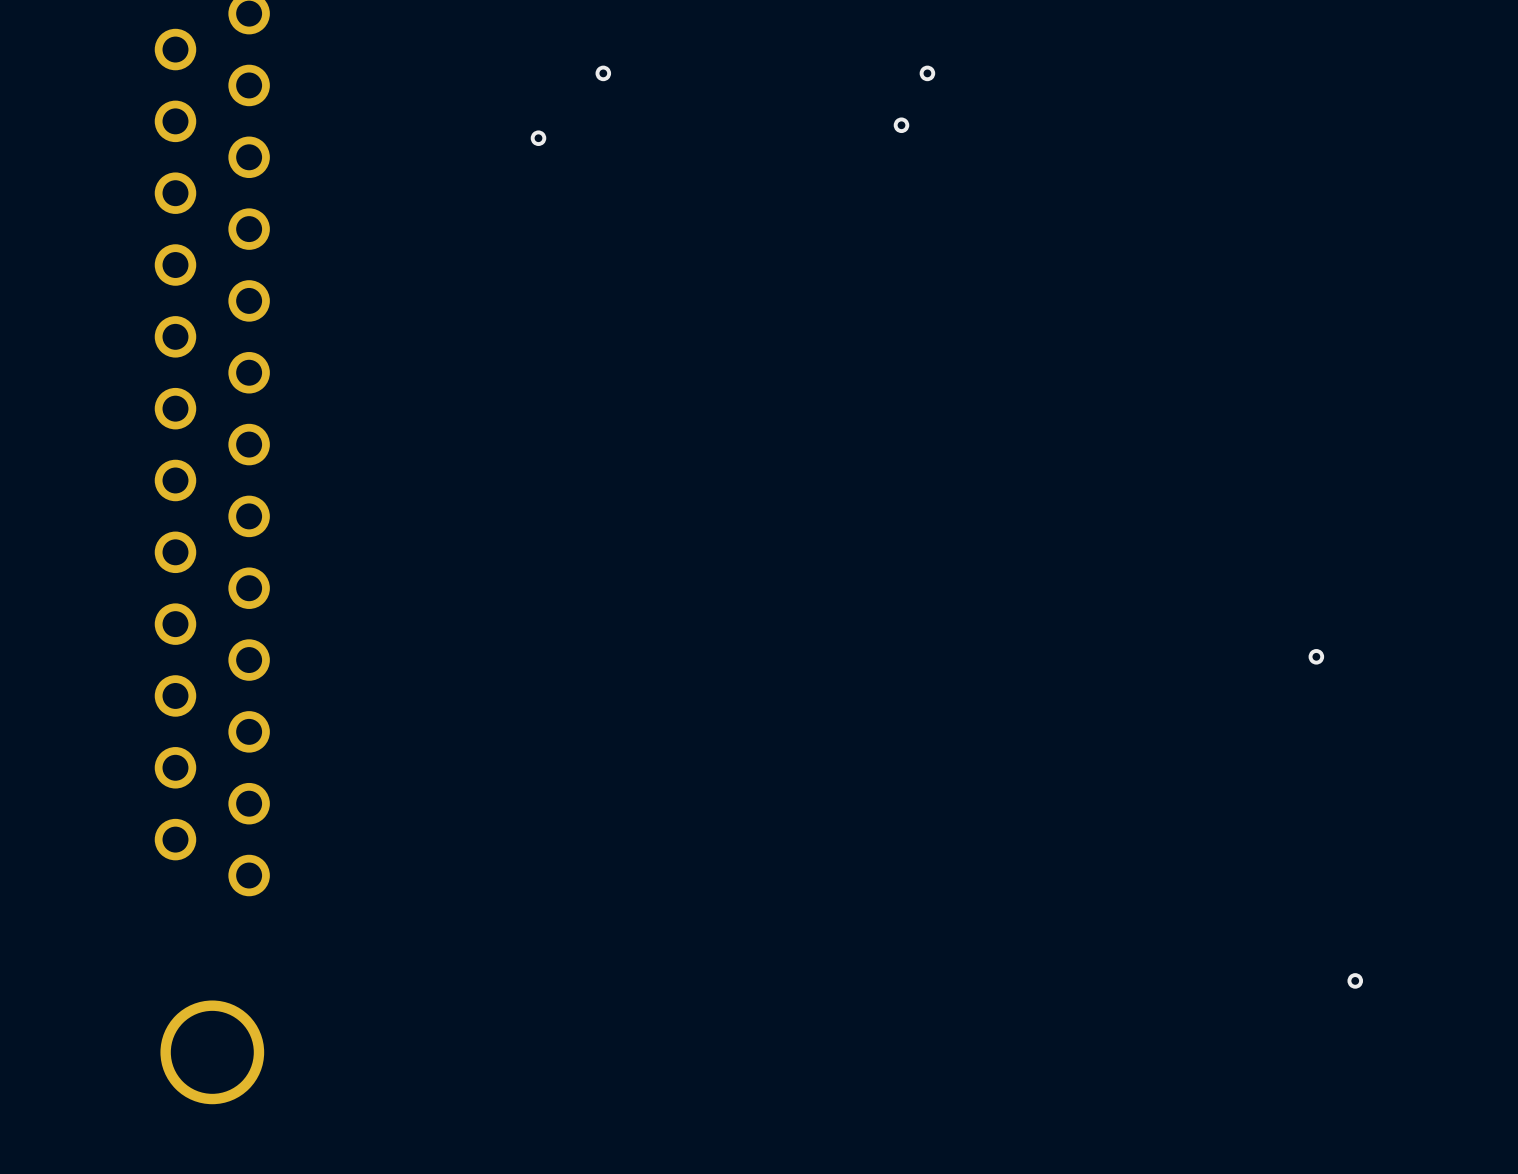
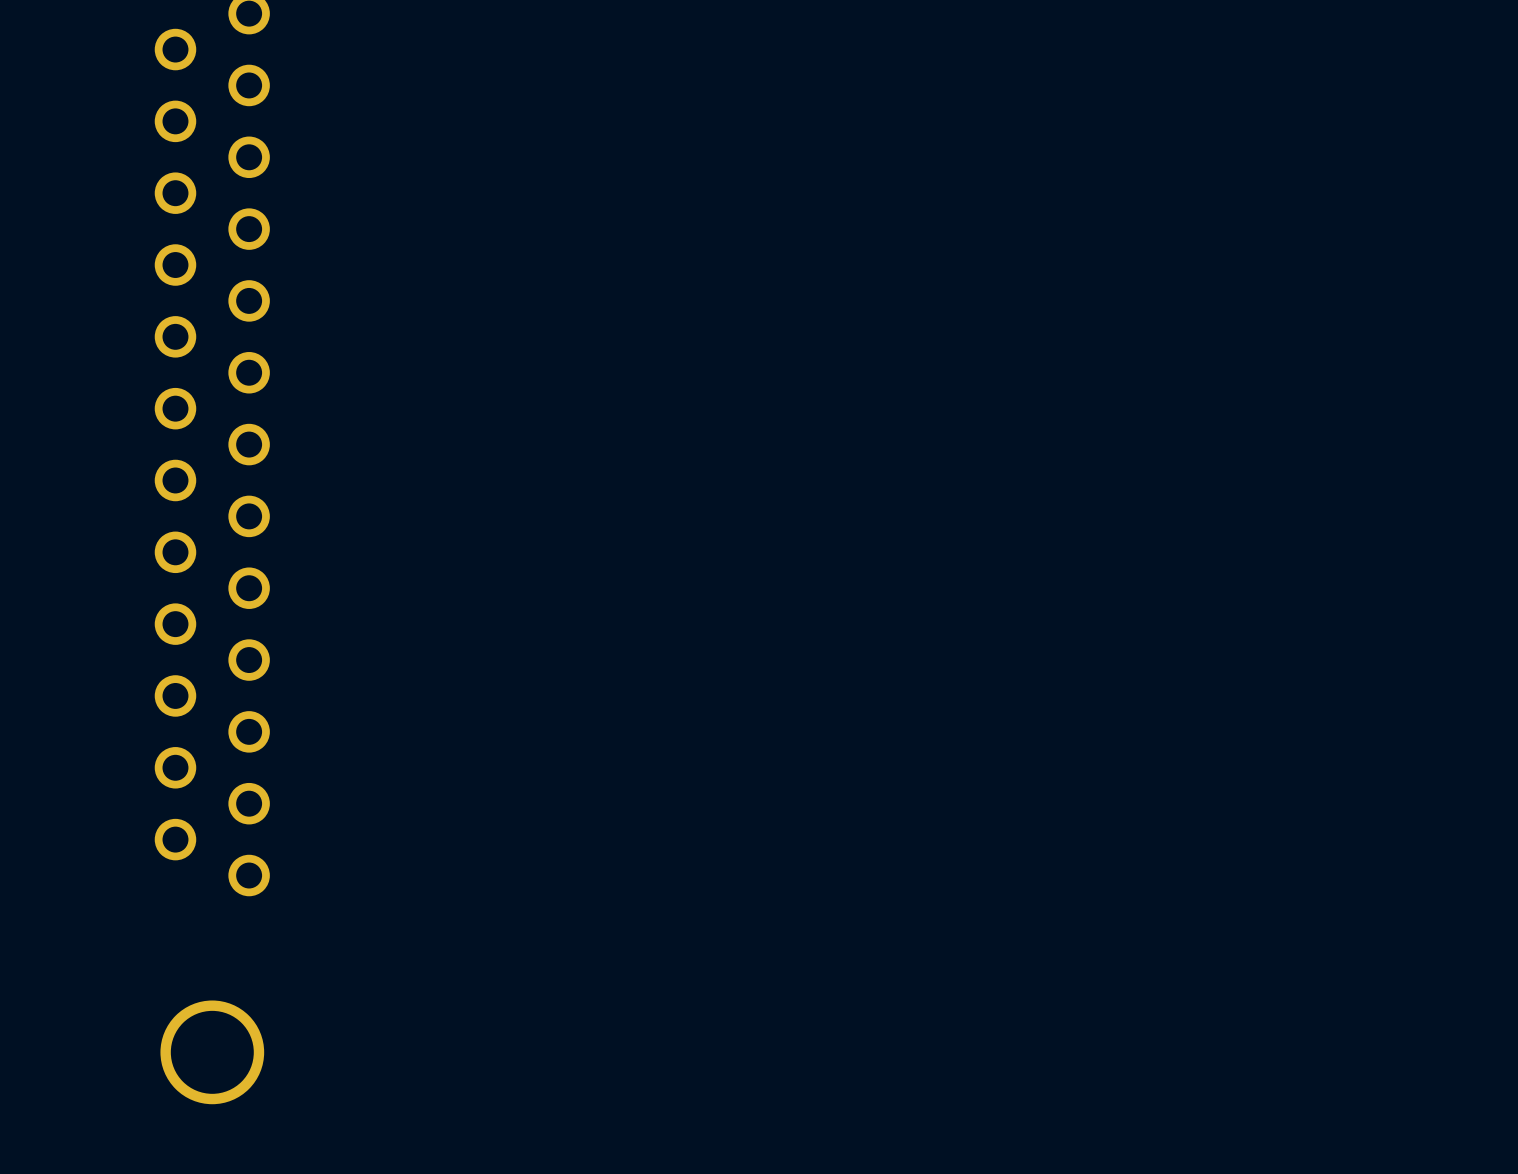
via: (603, 73) -> none
via: (927, 73) -> none
via: (901, 125) -> none
via: (538, 138) -> none
via: (1316, 656) -> none
via: (1355, 980) -> none

